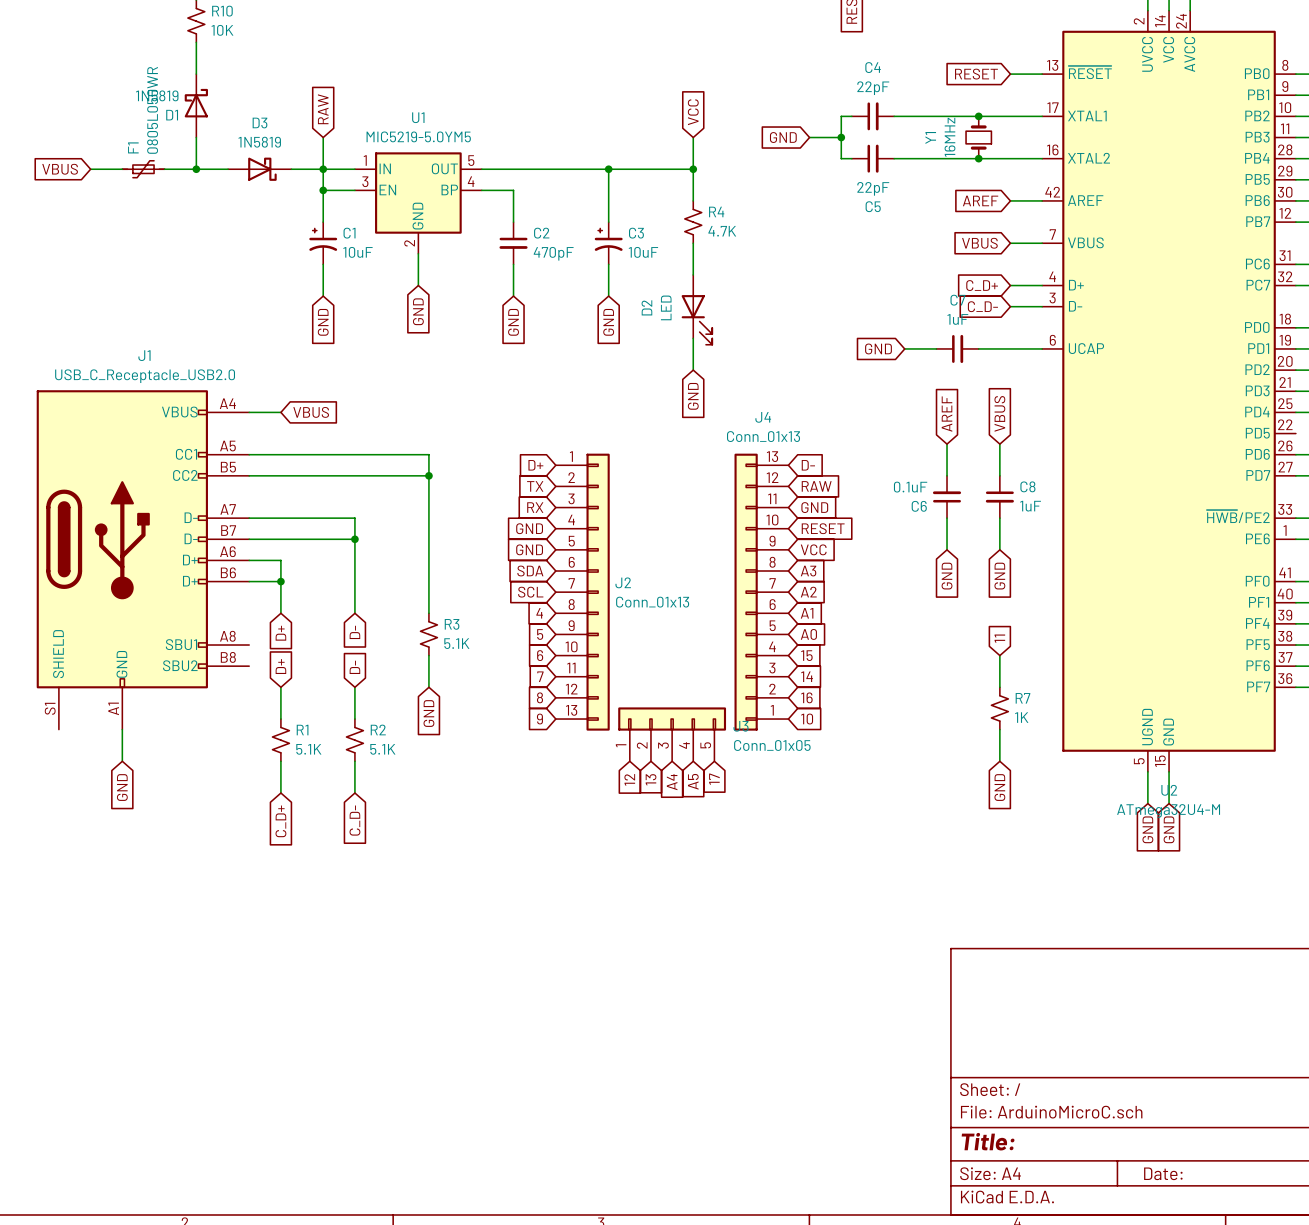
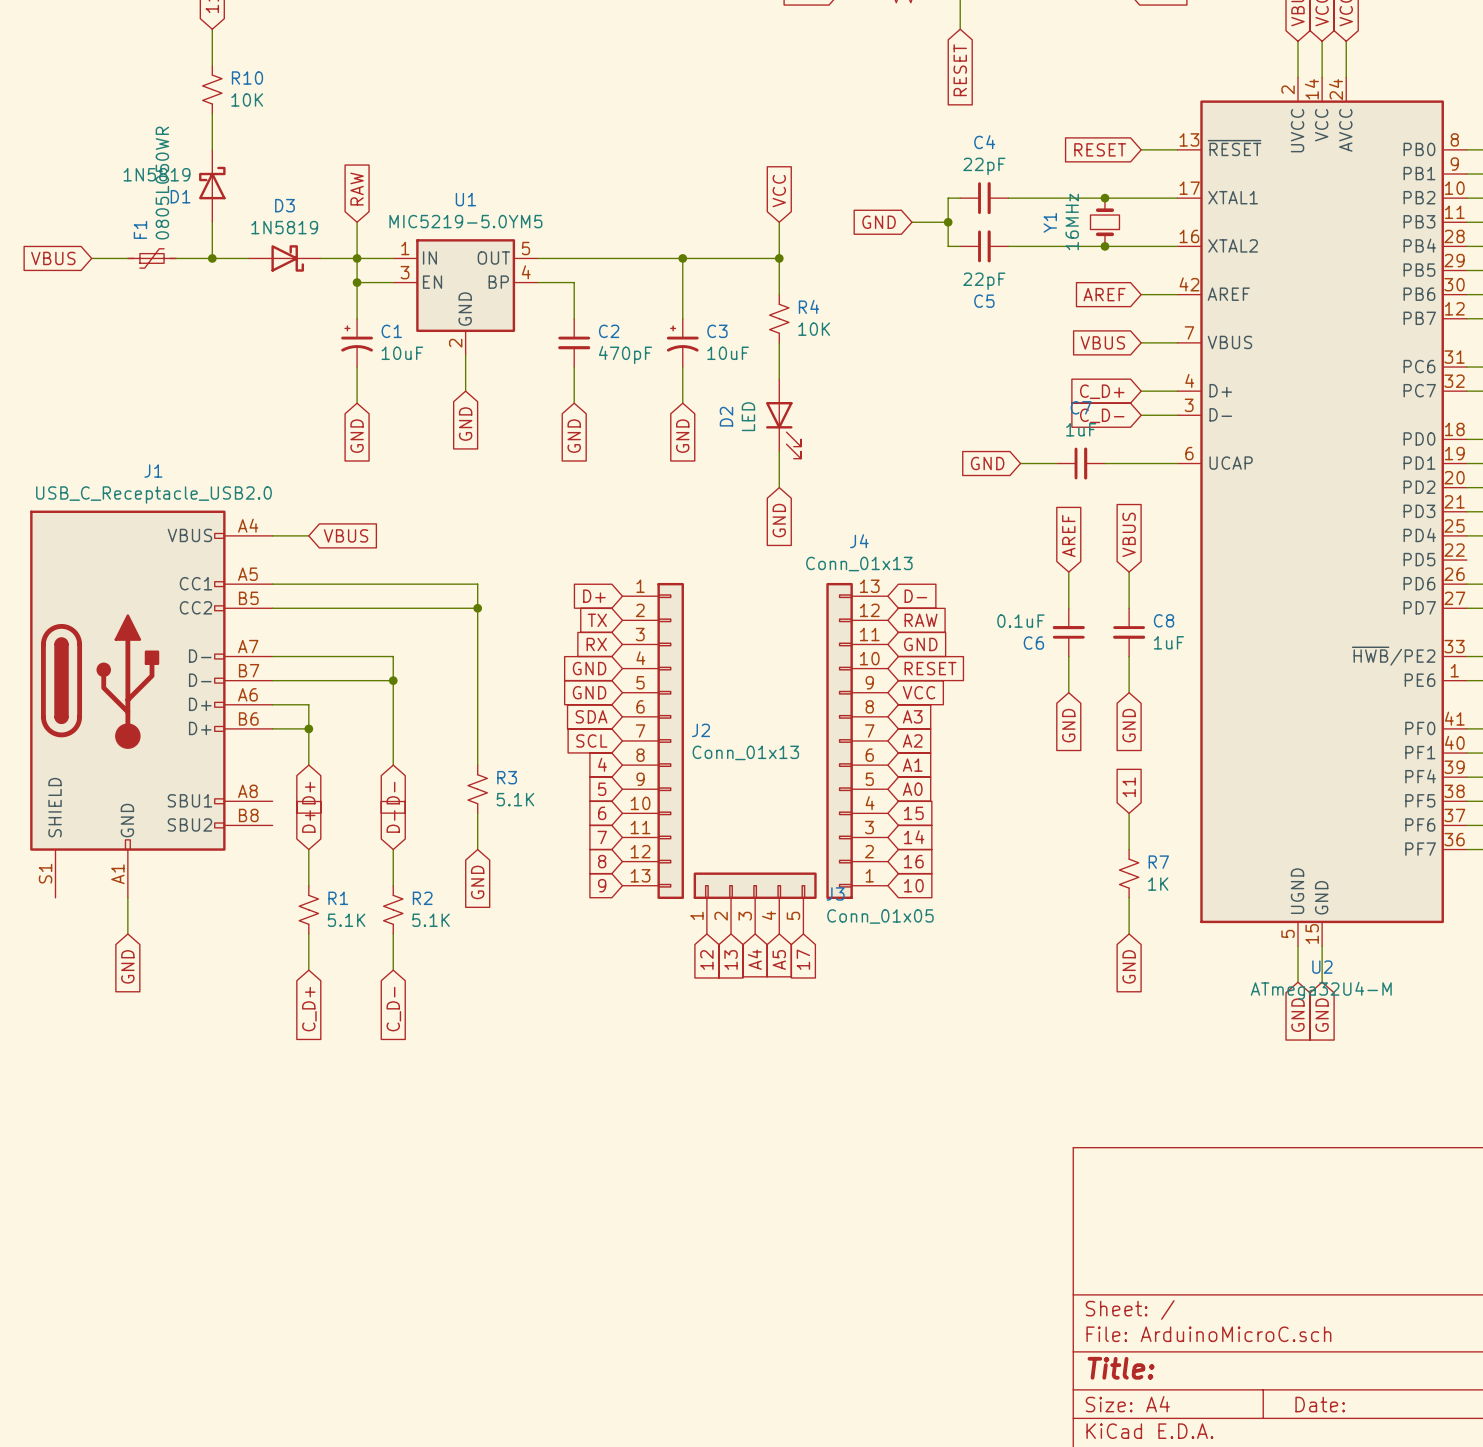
R4 value: 4.7K (722, 231) -> 10K (814, 329)

